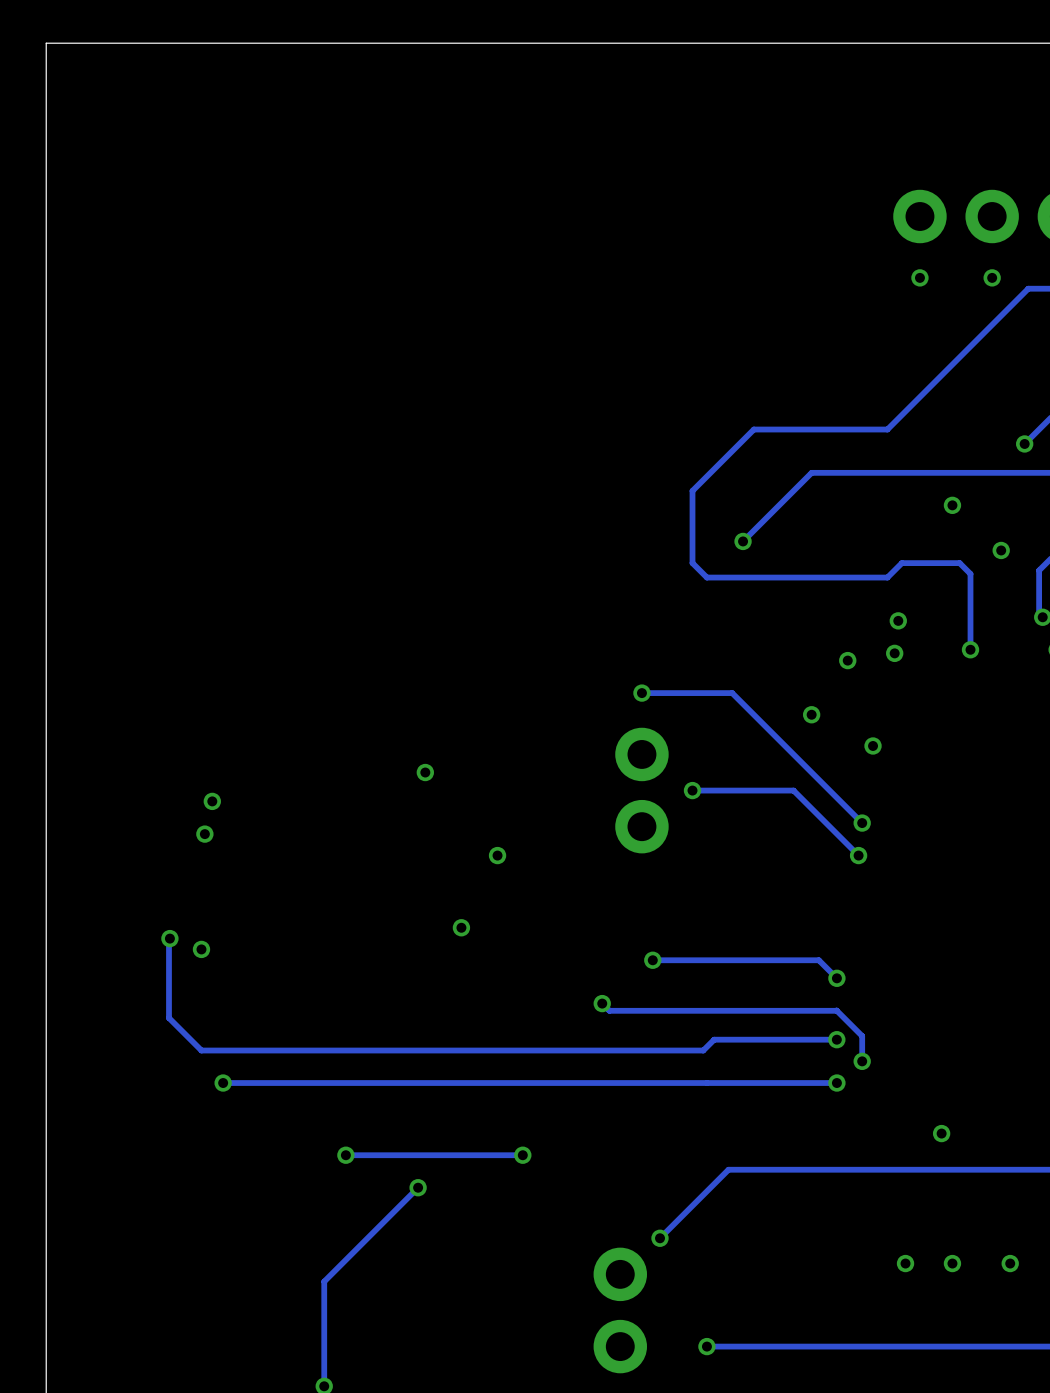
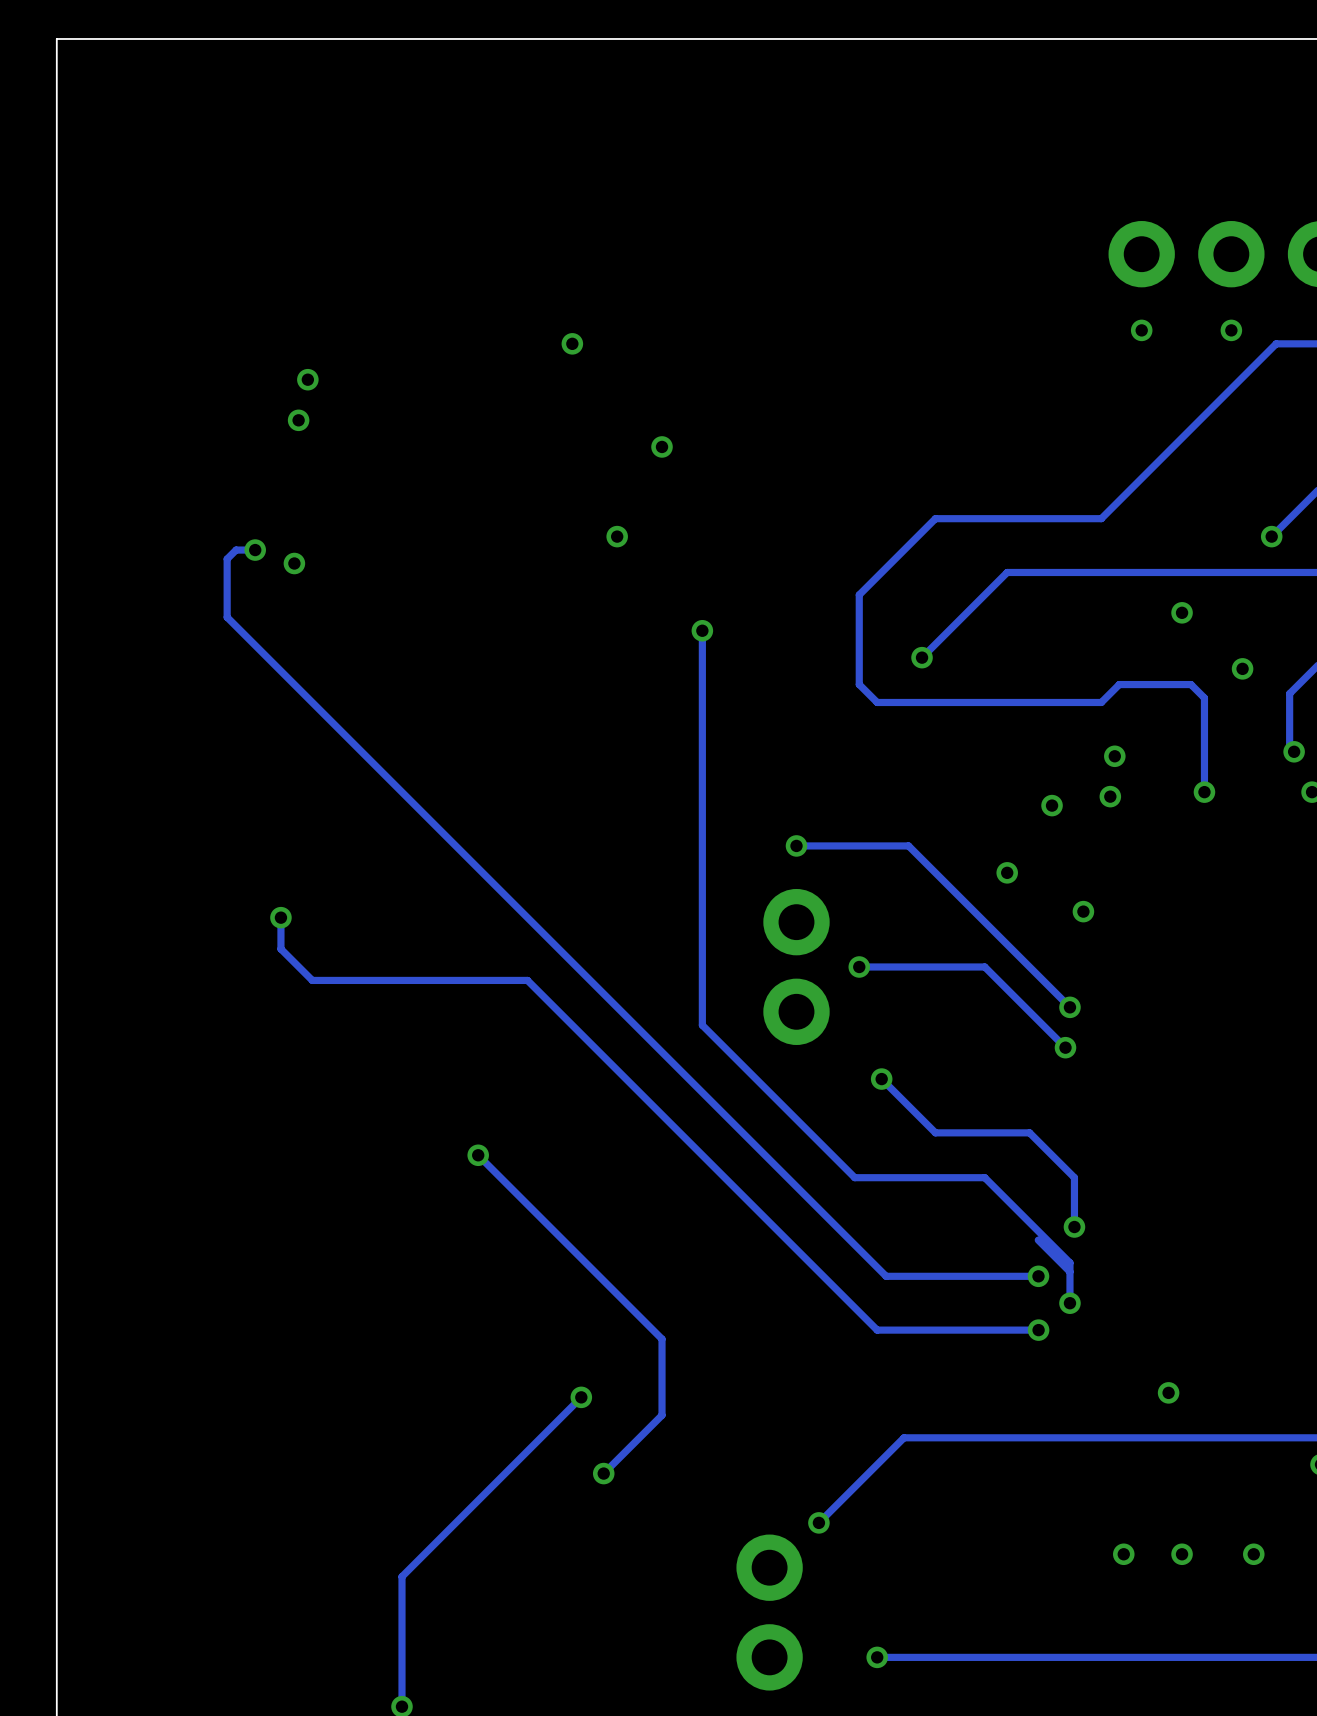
via: none -> (572, 343)
via: none -> (307, 379)
via: none -> (298, 420)
via: none -> (662, 446)
via: none -> (617, 536)
via: none -> (255, 550)
via: none -> (294, 563)
via: none -> (702, 630)
via: none -> (280, 917)
via: (425, 772) -> none
via: (212, 801) -> none
via: (204, 834) -> none
via: (497, 855) -> none
track: none -> (881, 1079) (935, 1132) (1029, 1132) (1074, 1177) (1074, 1227)
via: none -> (881, 1079)
via: (461, 927) -> none
track: (169, 938) (168, 1018) (201, 1050) (703, 1050) (714, 1039) -> (255, 550) (236, 550) (227, 559) (227, 617) (886, 1276)
via: (169, 938) -> none
track: none -> (478, 1155) (662, 1339) (662, 1415) (603, 1473)
via: none -> (478, 1155)
via: (201, 949) -> none
via: (652, 960) -> none
track: (688, 960) (652, 960) -> (854, 1177) (702, 1025) (702, 630)
track: (793, 960) (818, 960) (836, 978) -> (984, 1177) (1069, 1262) (1069, 1271)
via position: (836, 978) -> (1074, 1227)
track: (602, 1003) (609, 1010) (836, 1010) -> none
via: (602, 1003) -> none
via: (223, 1083) -> none
track: (706, 1083) (223, 1083) -> (877, 1330) (527, 980) (312, 980) (280, 949) (280, 917)
track: none -> (581, 1397) (518, 1460)
via: none -> (581, 1397)
via: (345, 1155) -> none
track: (522, 1155) (345, 1155) -> none
via: (522, 1155) -> none
via: (418, 1187) -> none
via: none -> (603, 1473)

